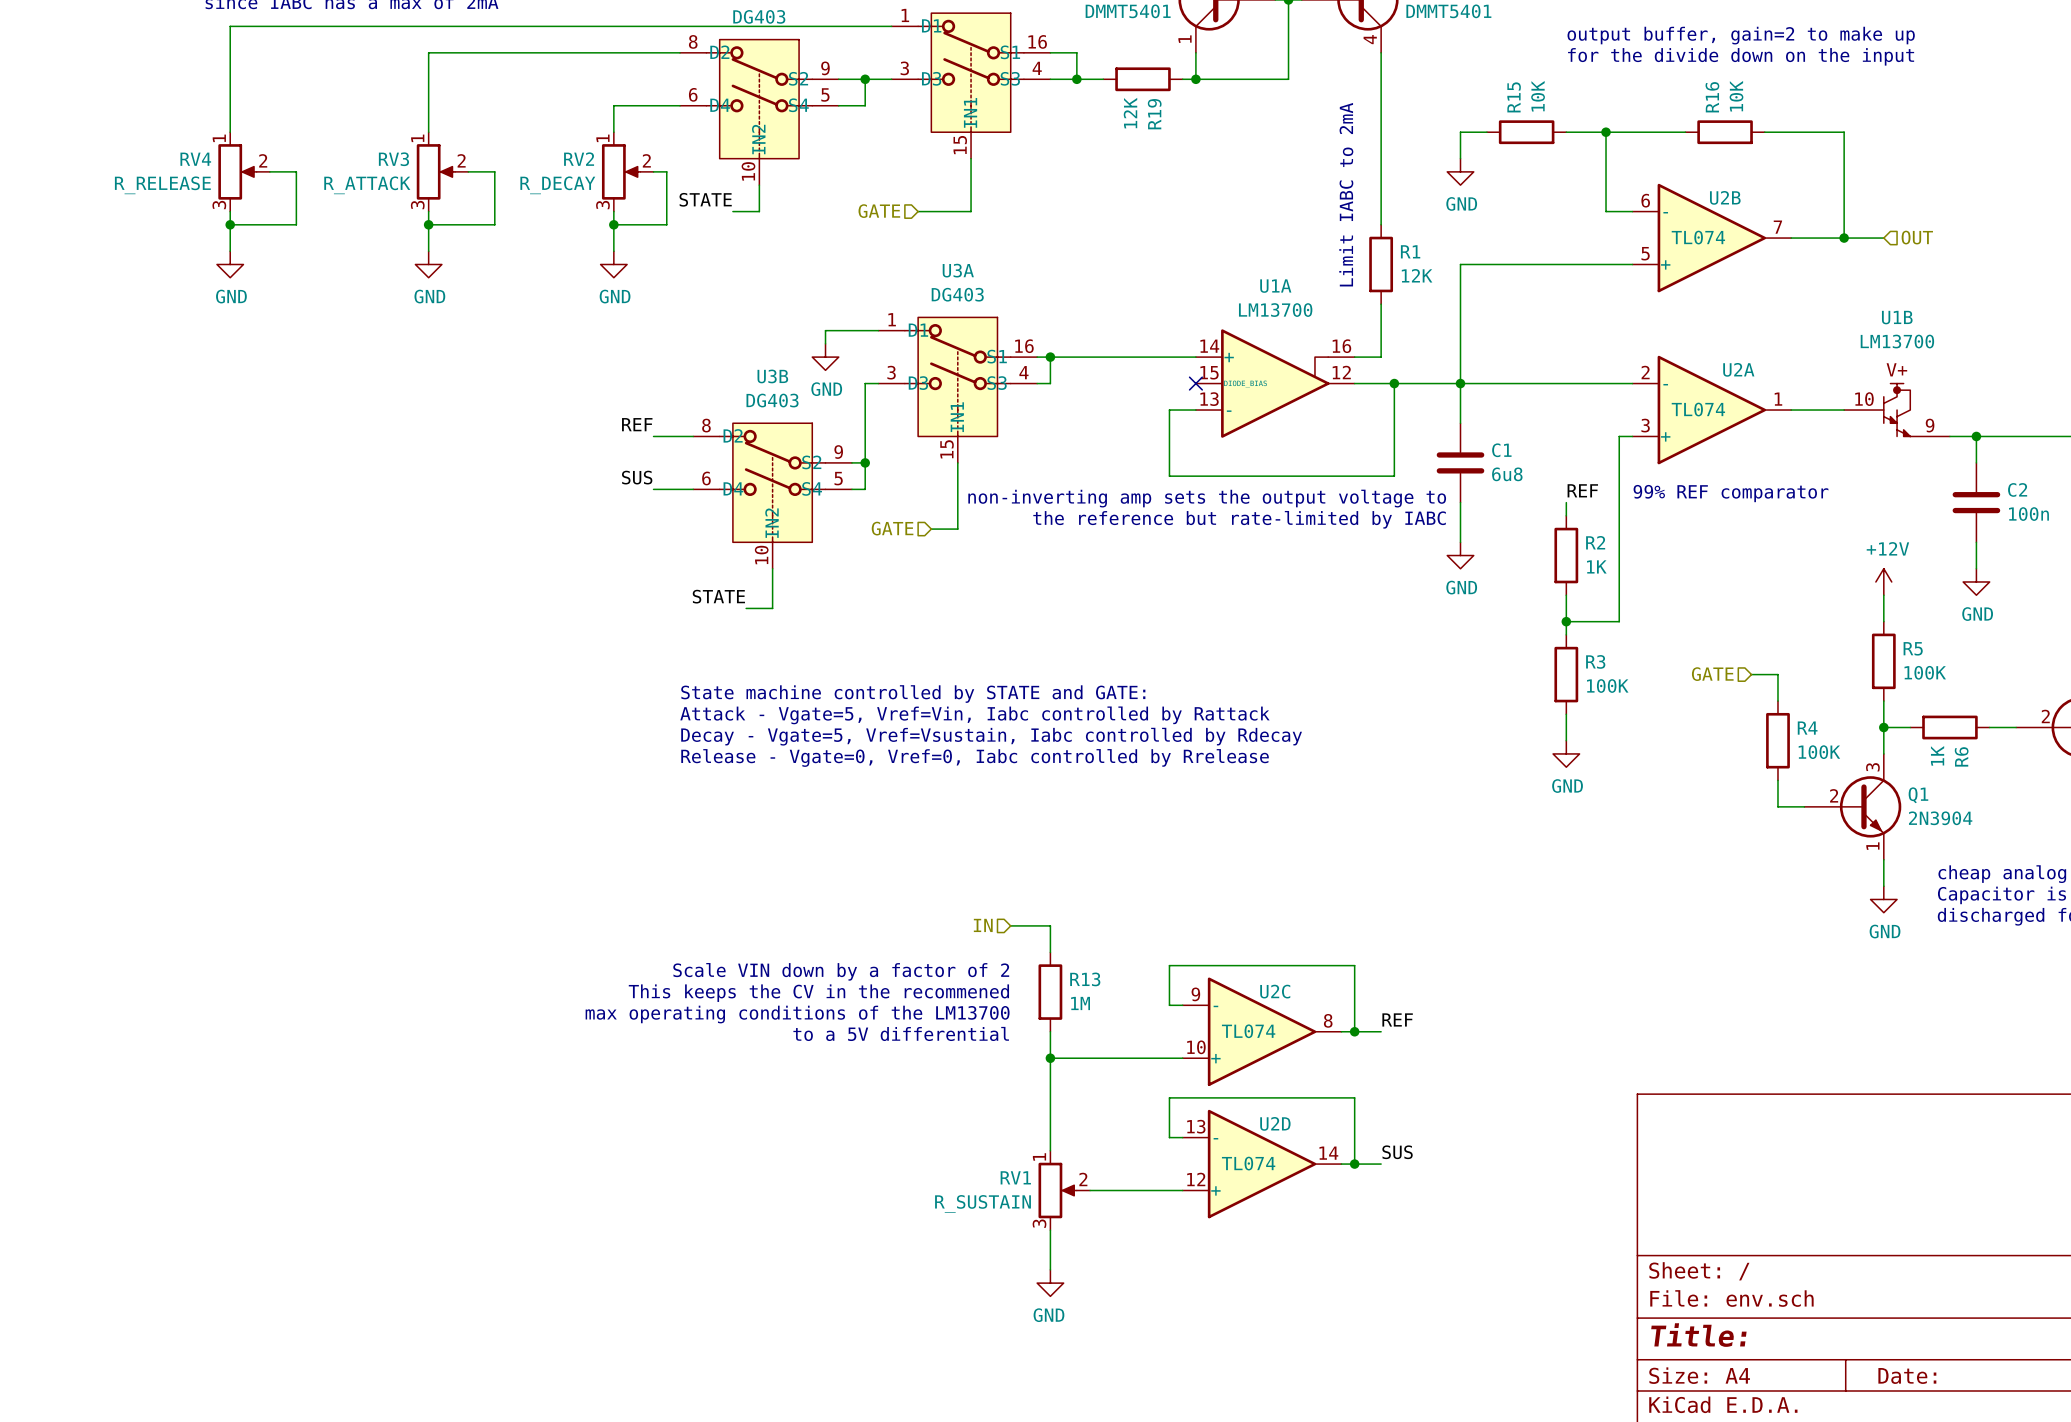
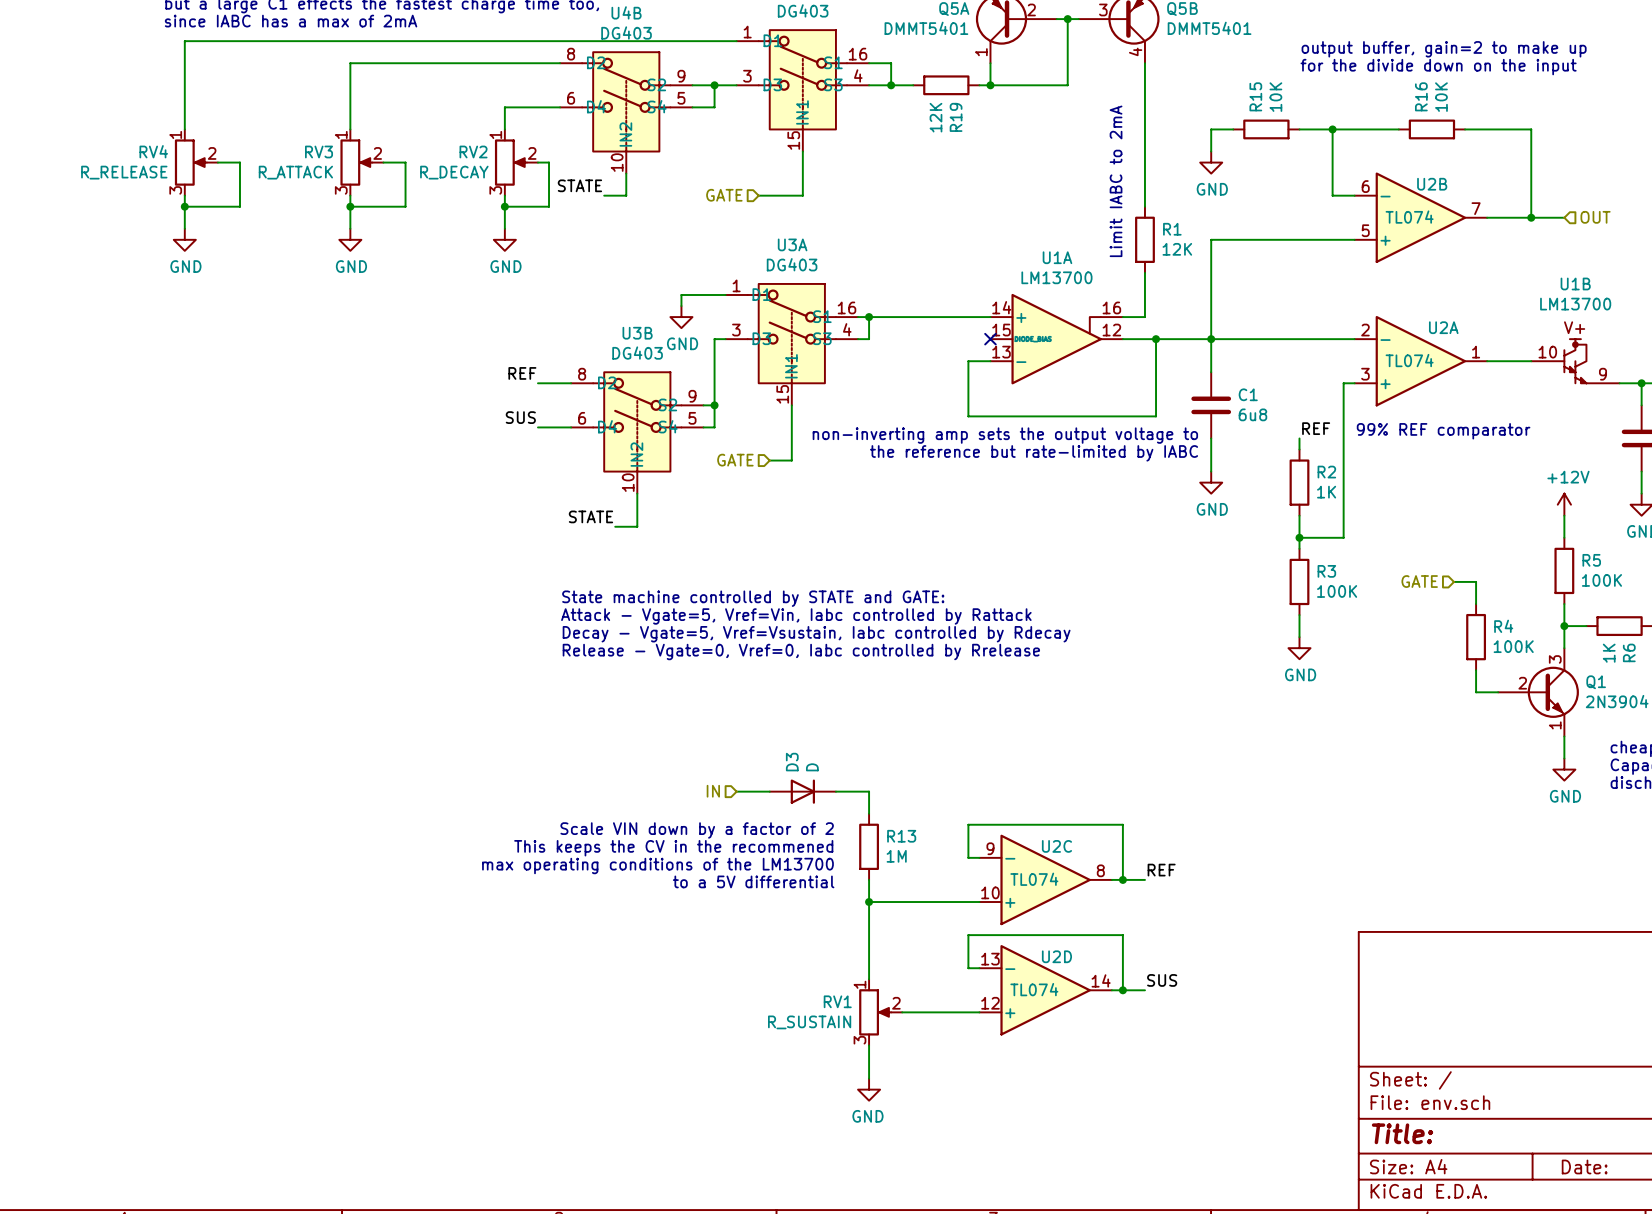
wire: none -> (736, 791) (769, 791)
D3: none -> D (802, 791)
hierarchical label position: IN (983, 925) -> IN (713, 791)

